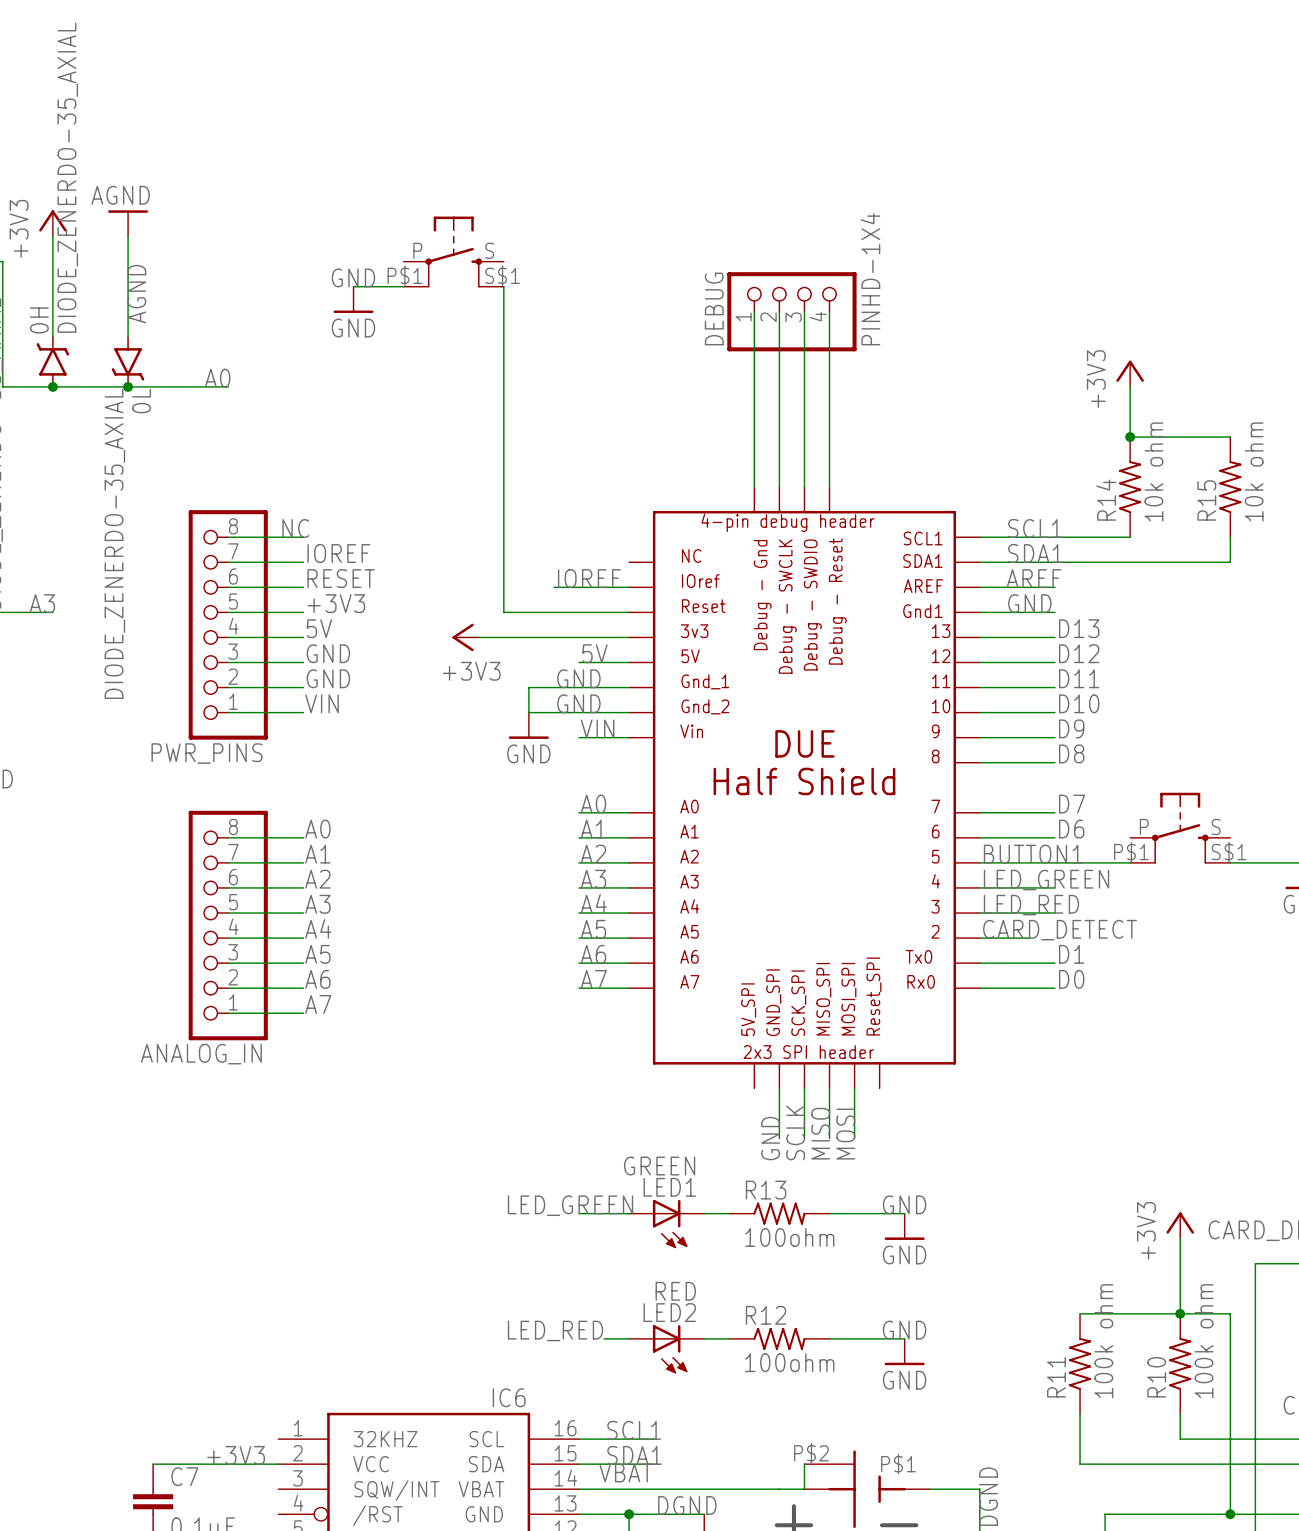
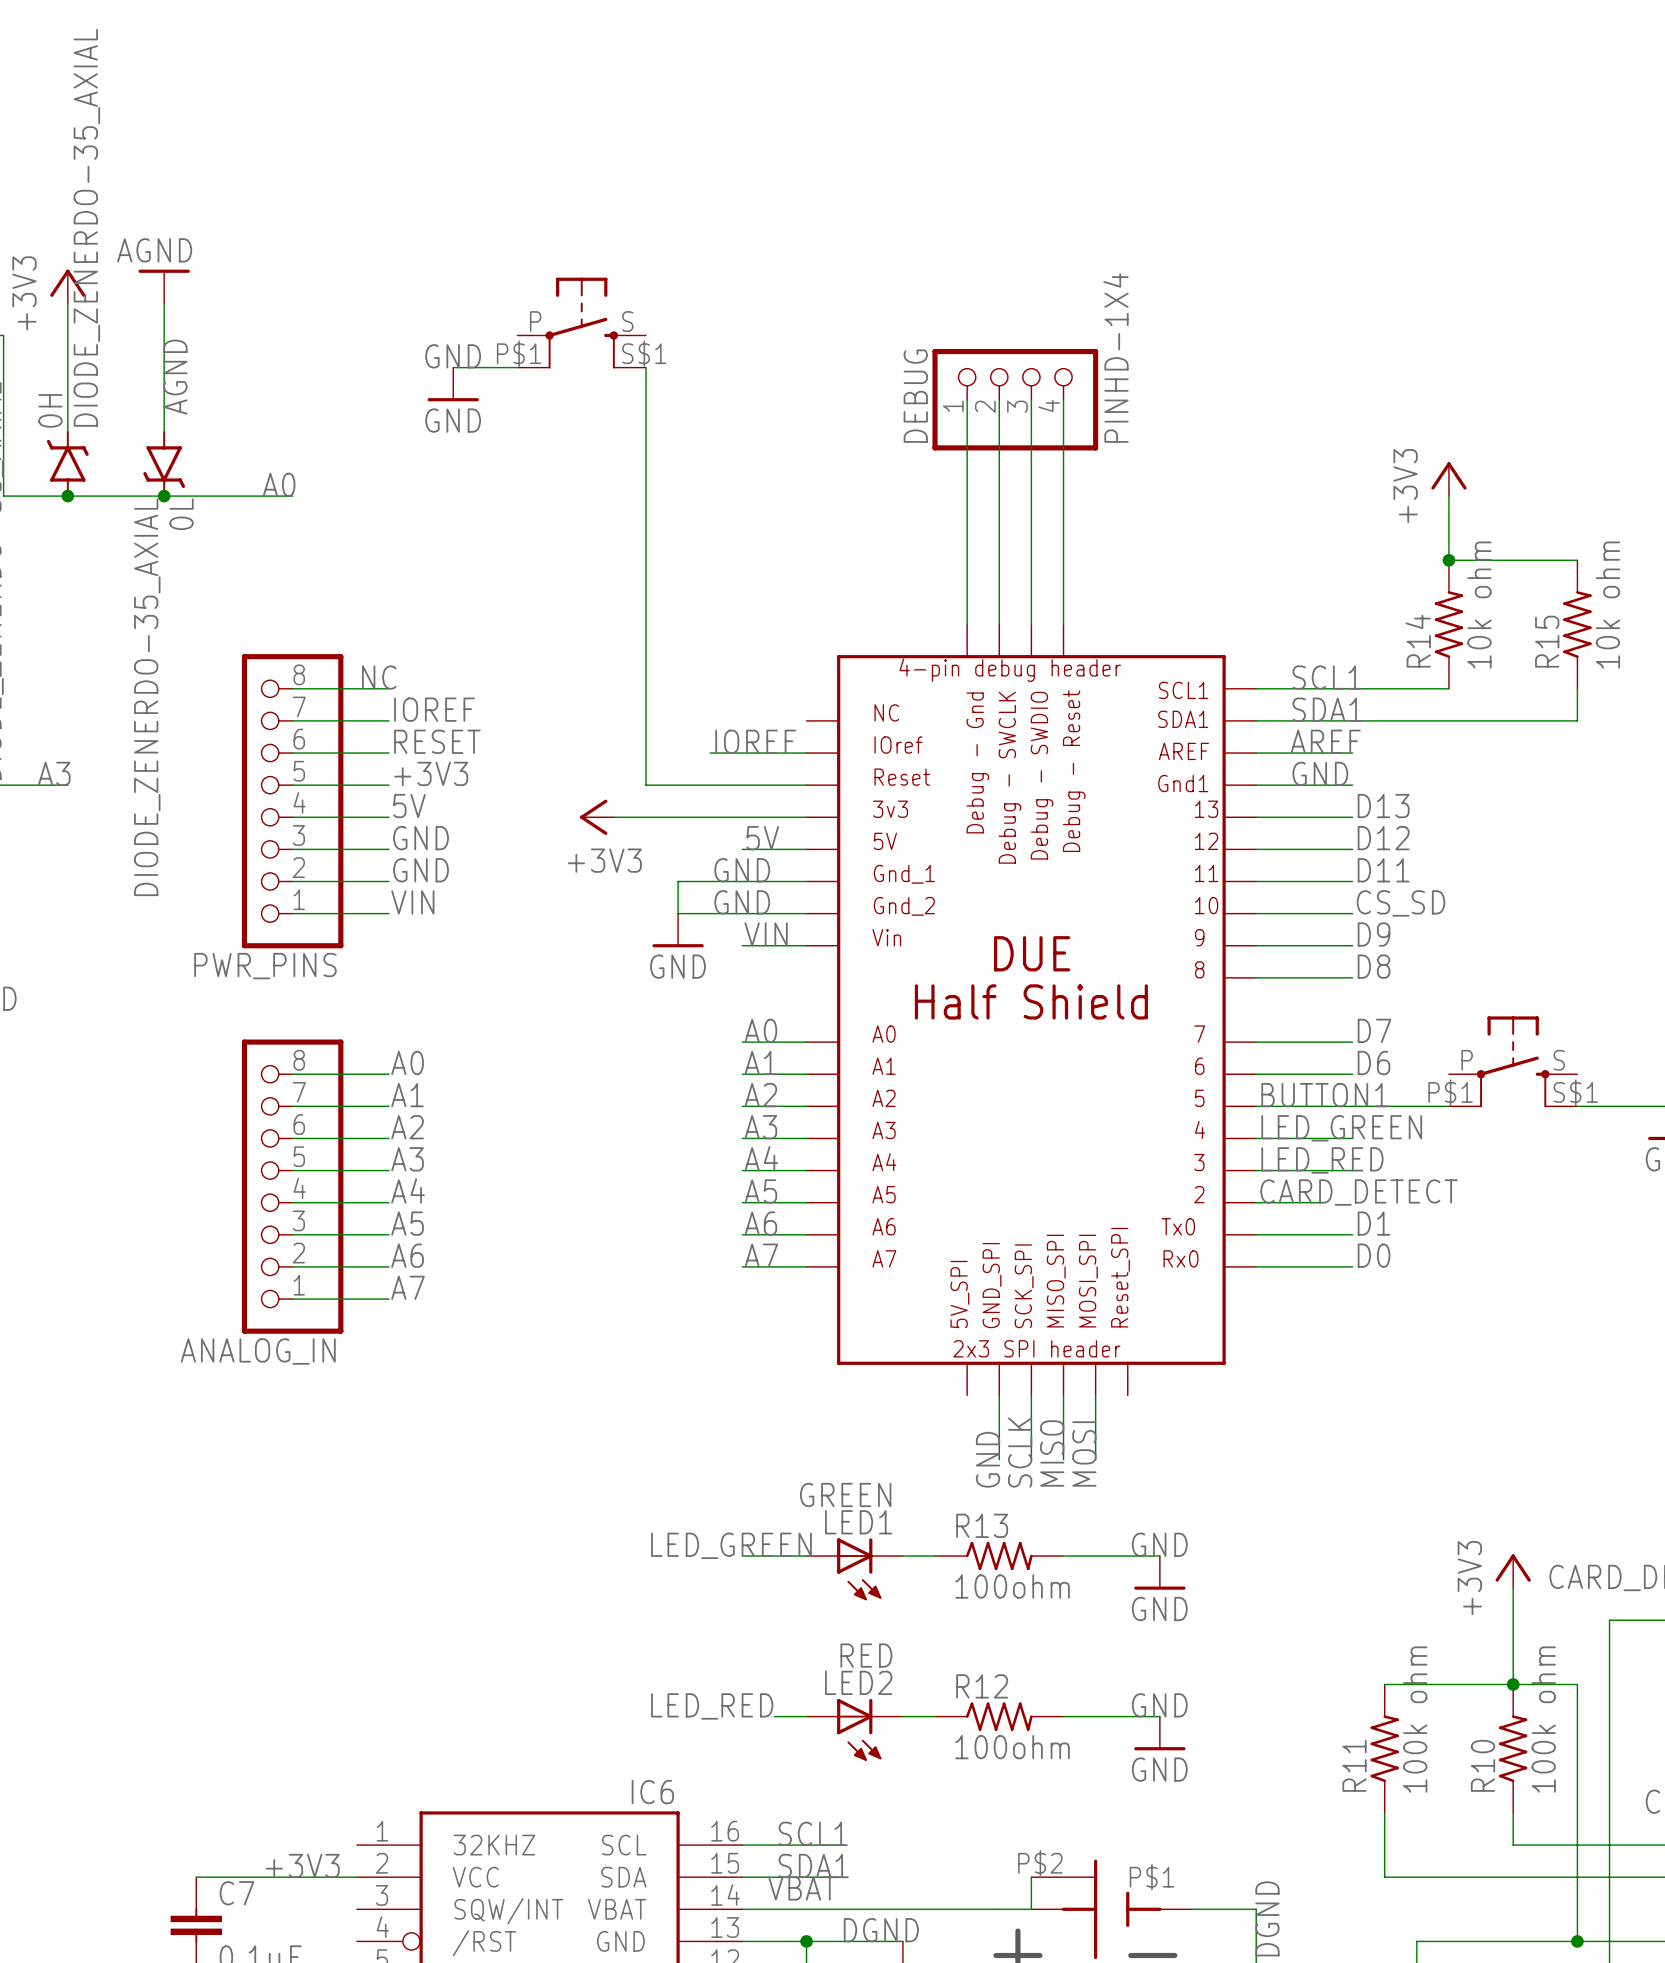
label: D10 (1079, 703) -> CS_SD (1400, 903)

